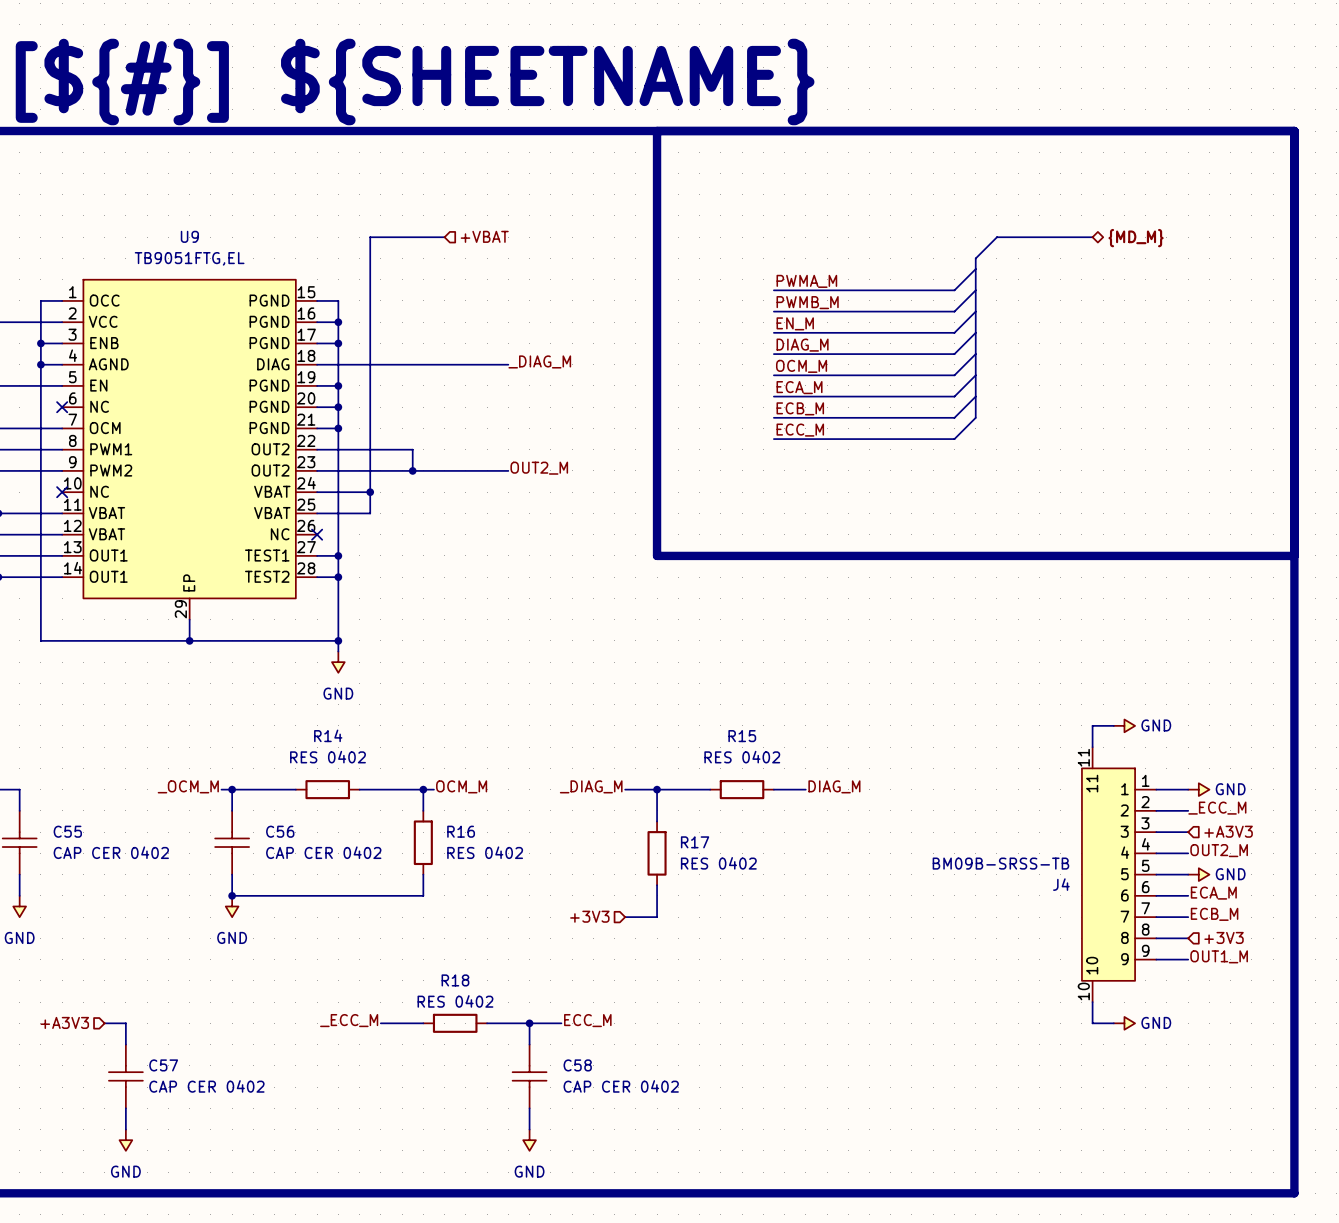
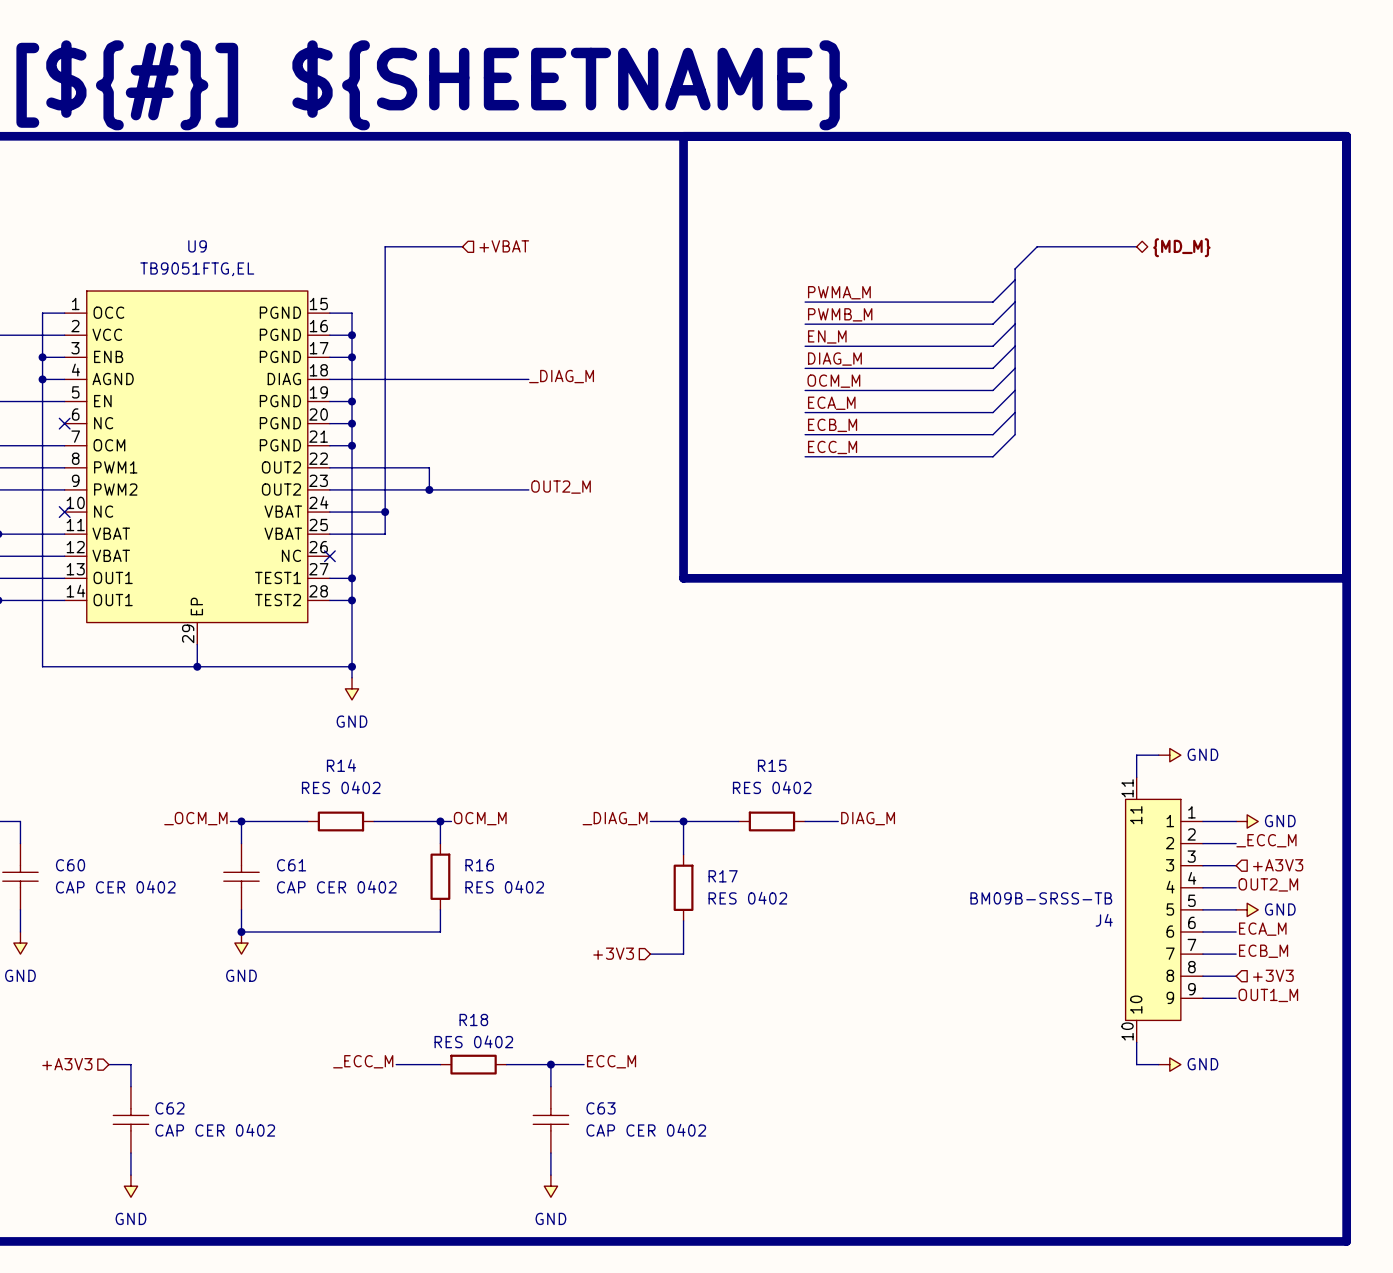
C55 name: C55 (67, 831) -> C60 (70, 865)
C56 name: C56 (280, 831) -> C61 (291, 865)
C57 name: C57 (163, 1065) -> C62 (170, 1108)
C58 name: C58 (577, 1065) -> C63 (601, 1108)

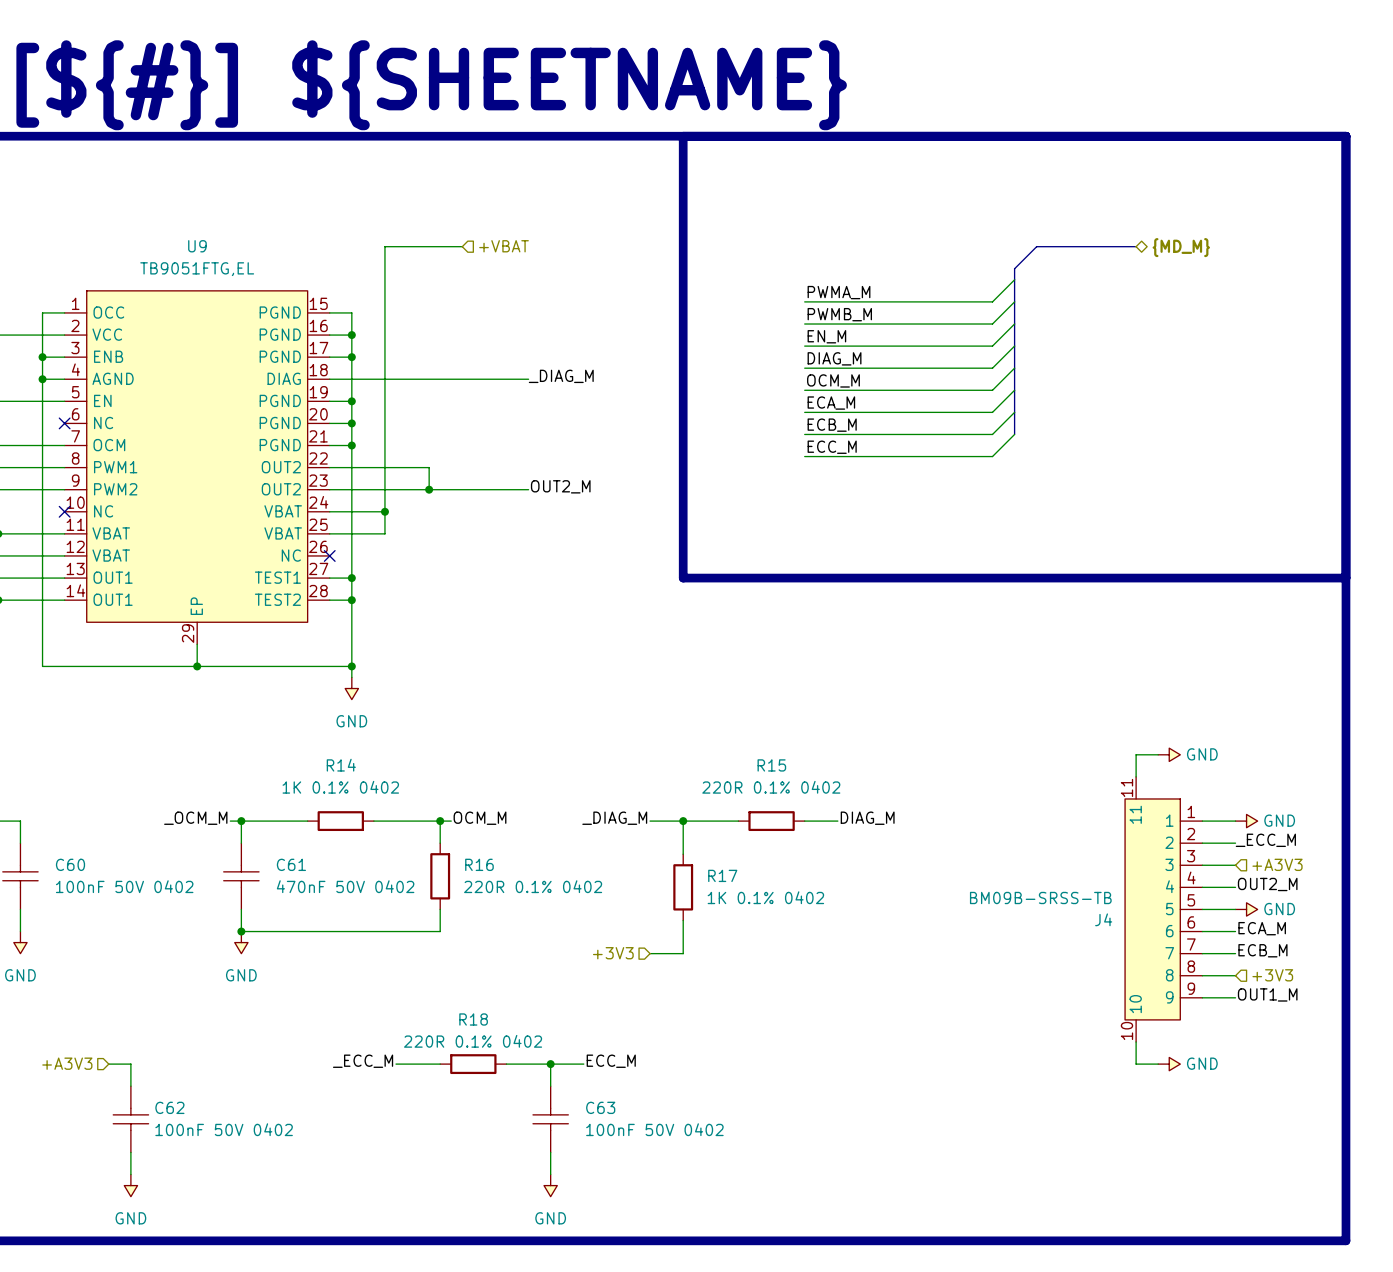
R14 value: RES 0402 (341, 787) -> 1K 0.1% 0402 (340, 787)
R15 value: RES 0402 (772, 787) -> 220R 0.1% 0402 (771, 787)
C60 value: CAP CER 0402 (115, 887) -> 100nF 50V 0402 (124, 886)
C61 value: CAP CER 0402 (336, 887) -> 470nF 50V 0402 (345, 886)
R16 value: RES 0402 (504, 887) -> 220R 0.1% 0402 (533, 886)
R17 value: RES 0402 (747, 898) -> 1K 0.1% 0402 (765, 897)
R18 value: RES 0402 (473, 1041) -> 220R 0.1% 0402 (473, 1041)
C62 value: CAP CER 0402 (215, 1130) -> 100nF 50V 0402 (224, 1129)
C63 value: CAP CER 0402 (646, 1130) -> 100nF 50V 0402 (654, 1129)

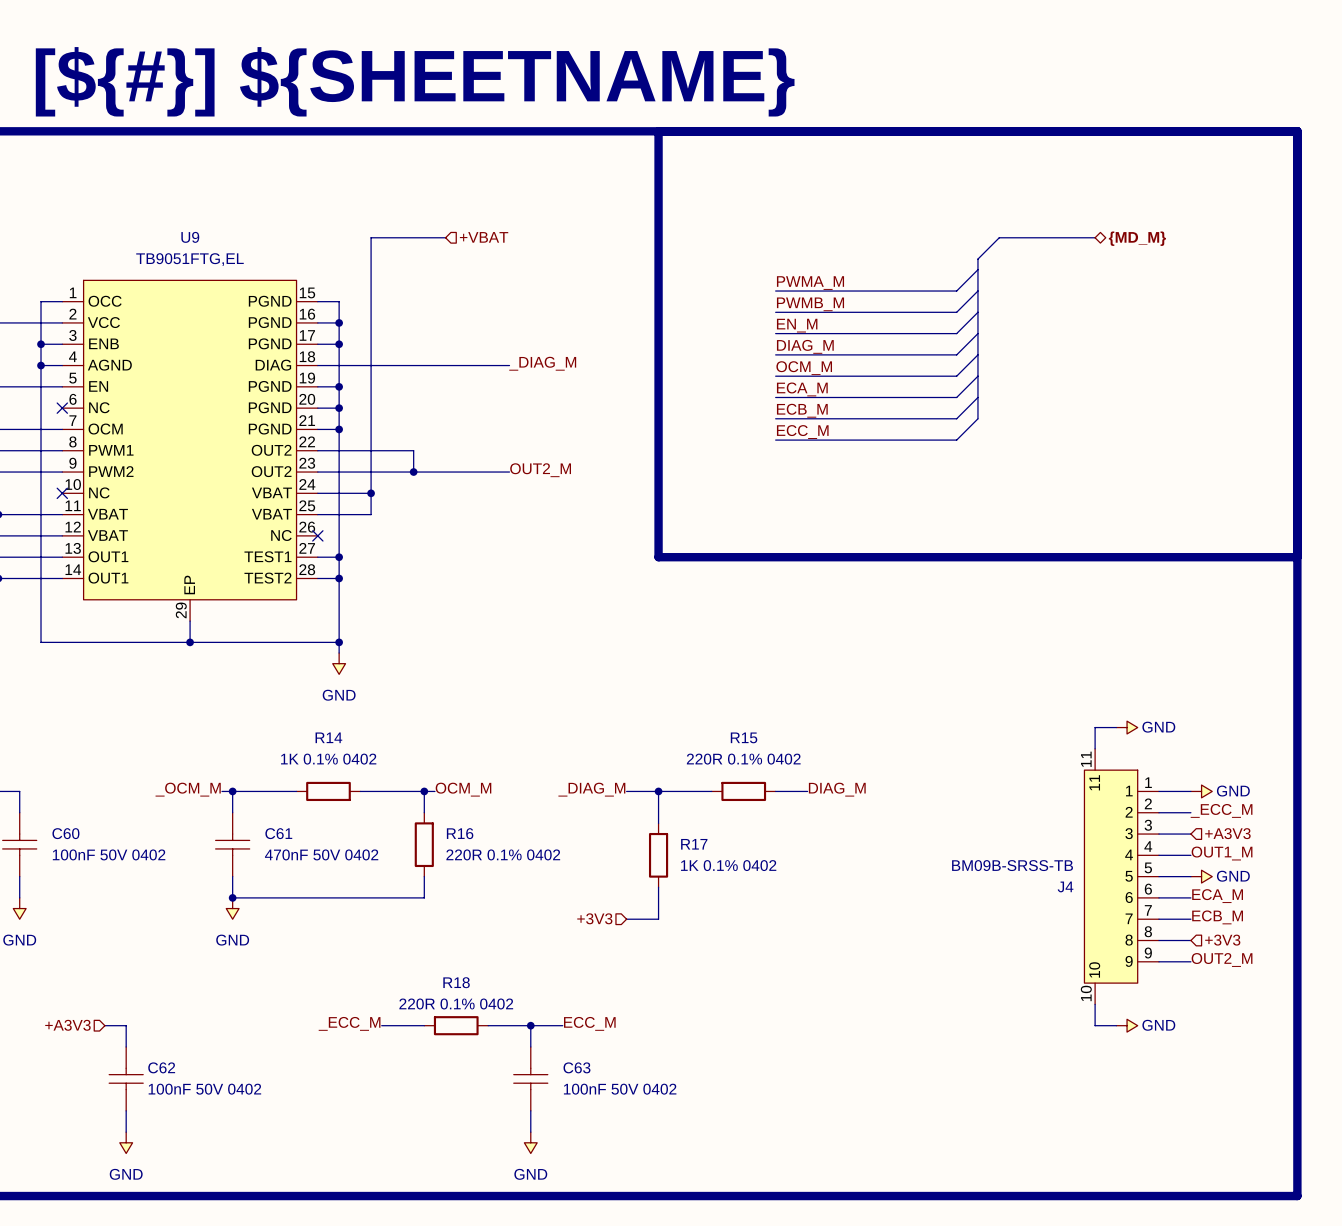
label: OUT2_M (1267, 884) -> OUT1_M (1222, 853)
label: OUT1_M (1267, 994) -> OUT2_M (1222, 959)

